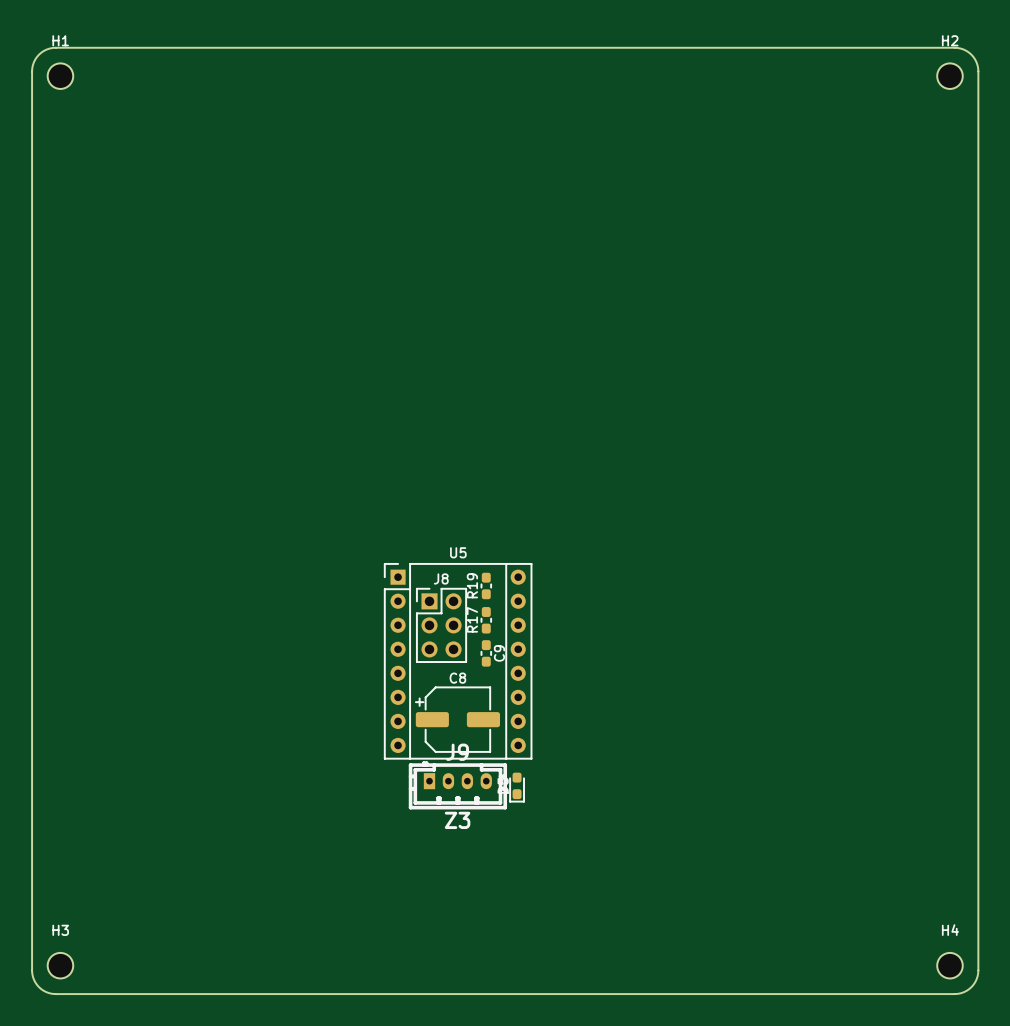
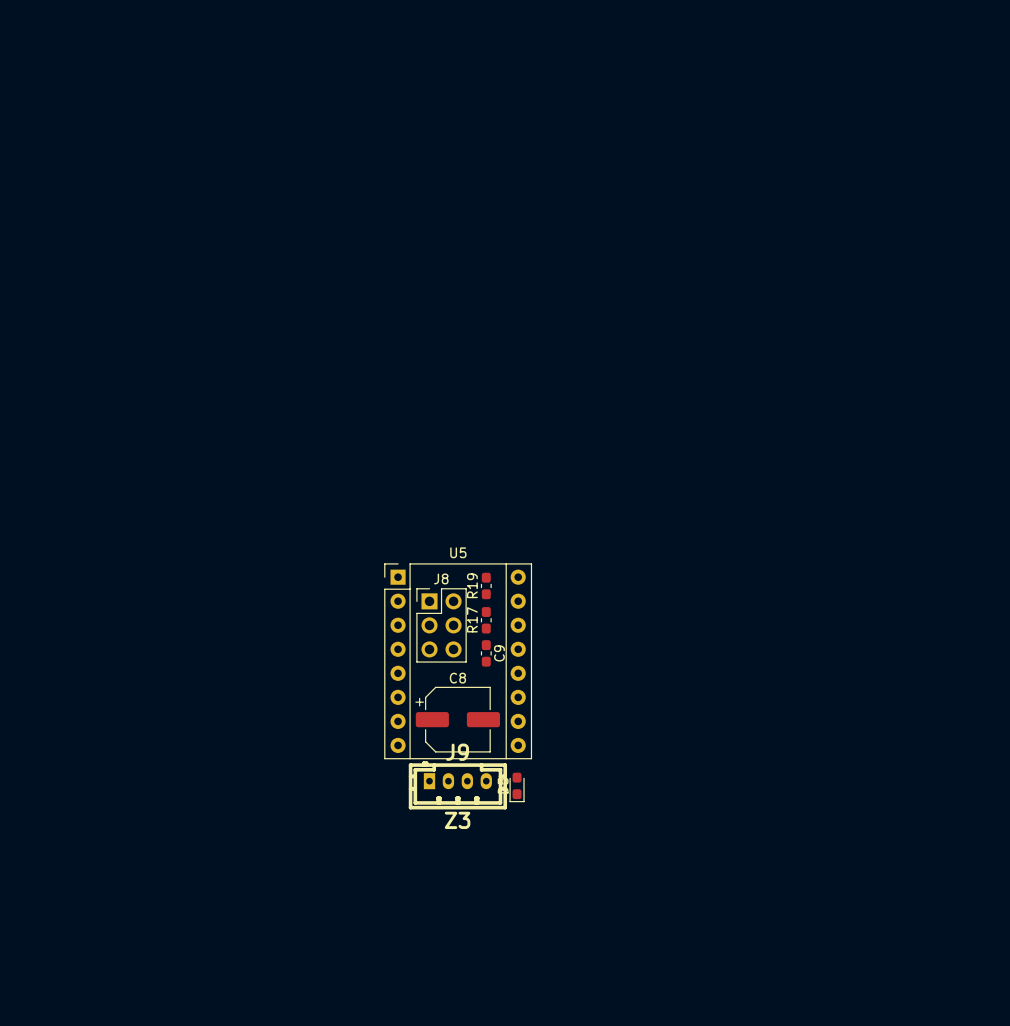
board edge: (55, 47) (954, 47) (963, 49) (971, 54) (976, 62) (978, 71) (978, 970) (976, 979) (971, 987) (963, 992) (954, 994) (55, 994) (46, 992) (39, 987) (33, 979) (32, 970) (32, 71) (33, 62) (39, 54) (46, 49) (55, 47) -> none
H1: (60, 76) -> none
H2: (949, 76) -> none
H3: (60, 965) -> none
H4: (949, 965) -> none

